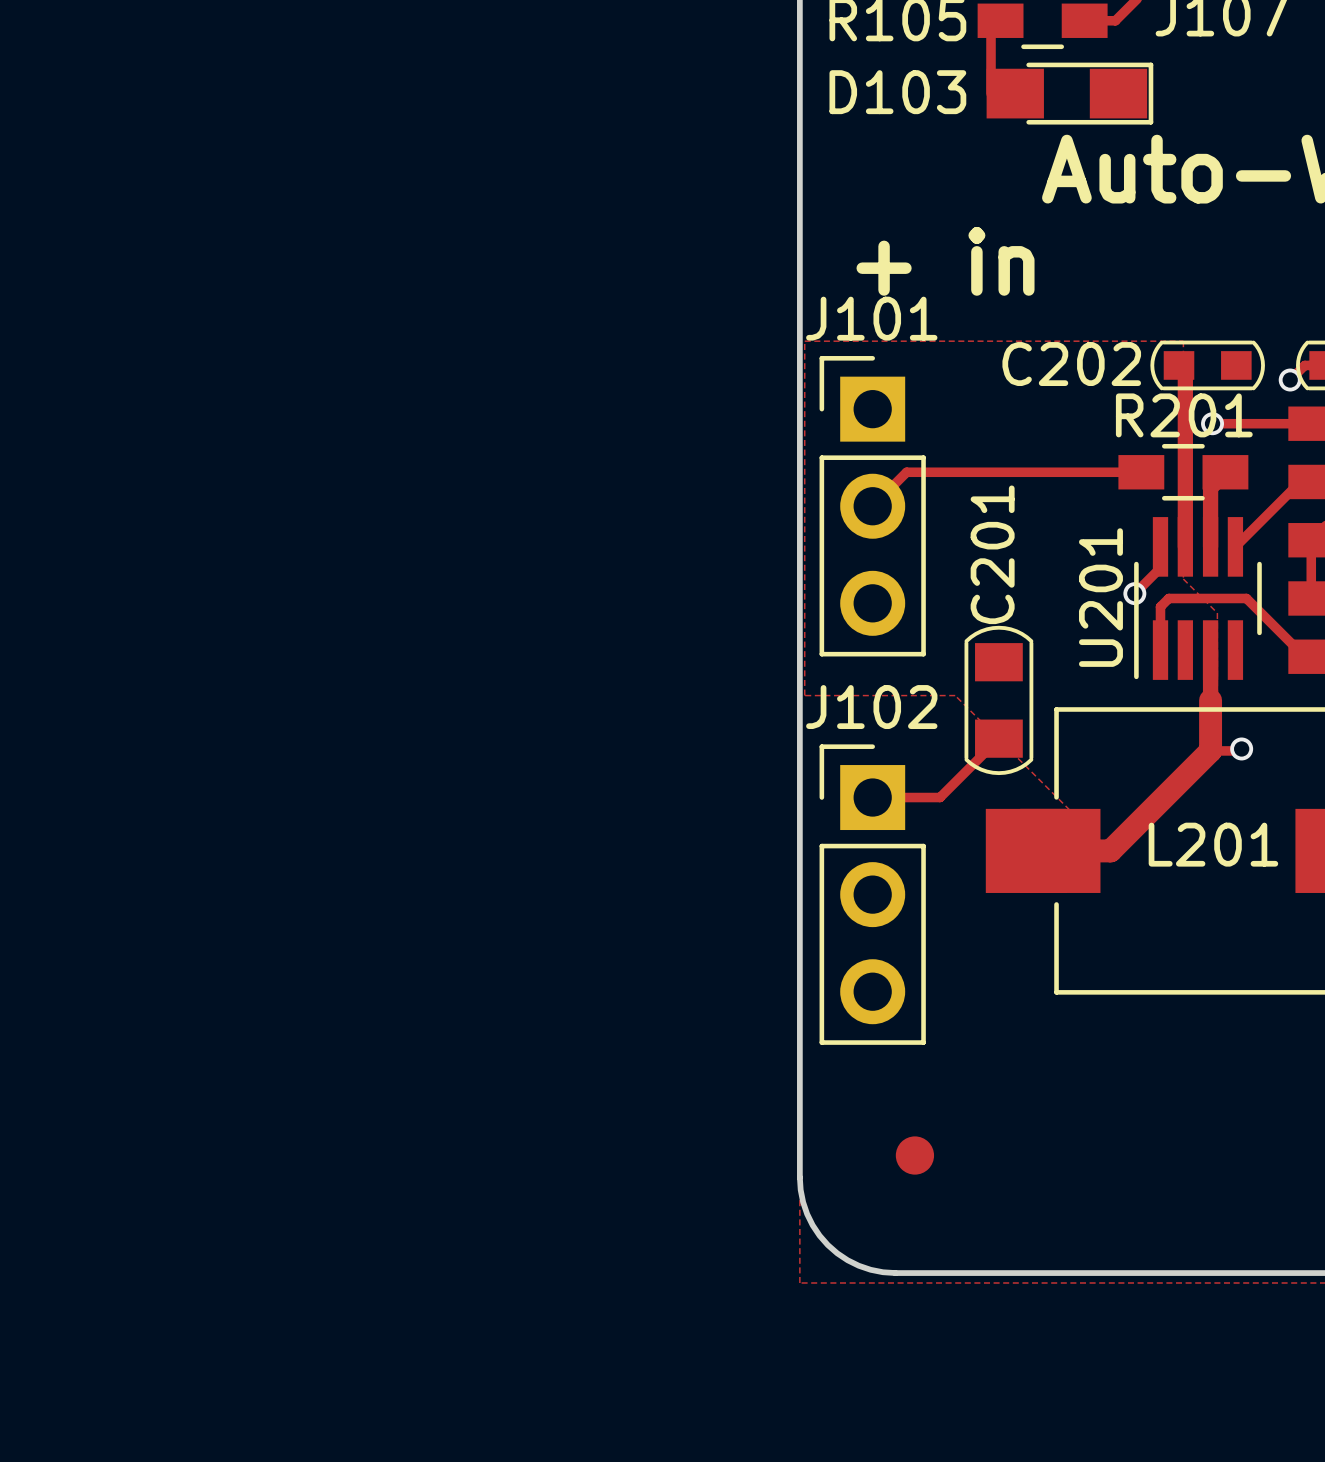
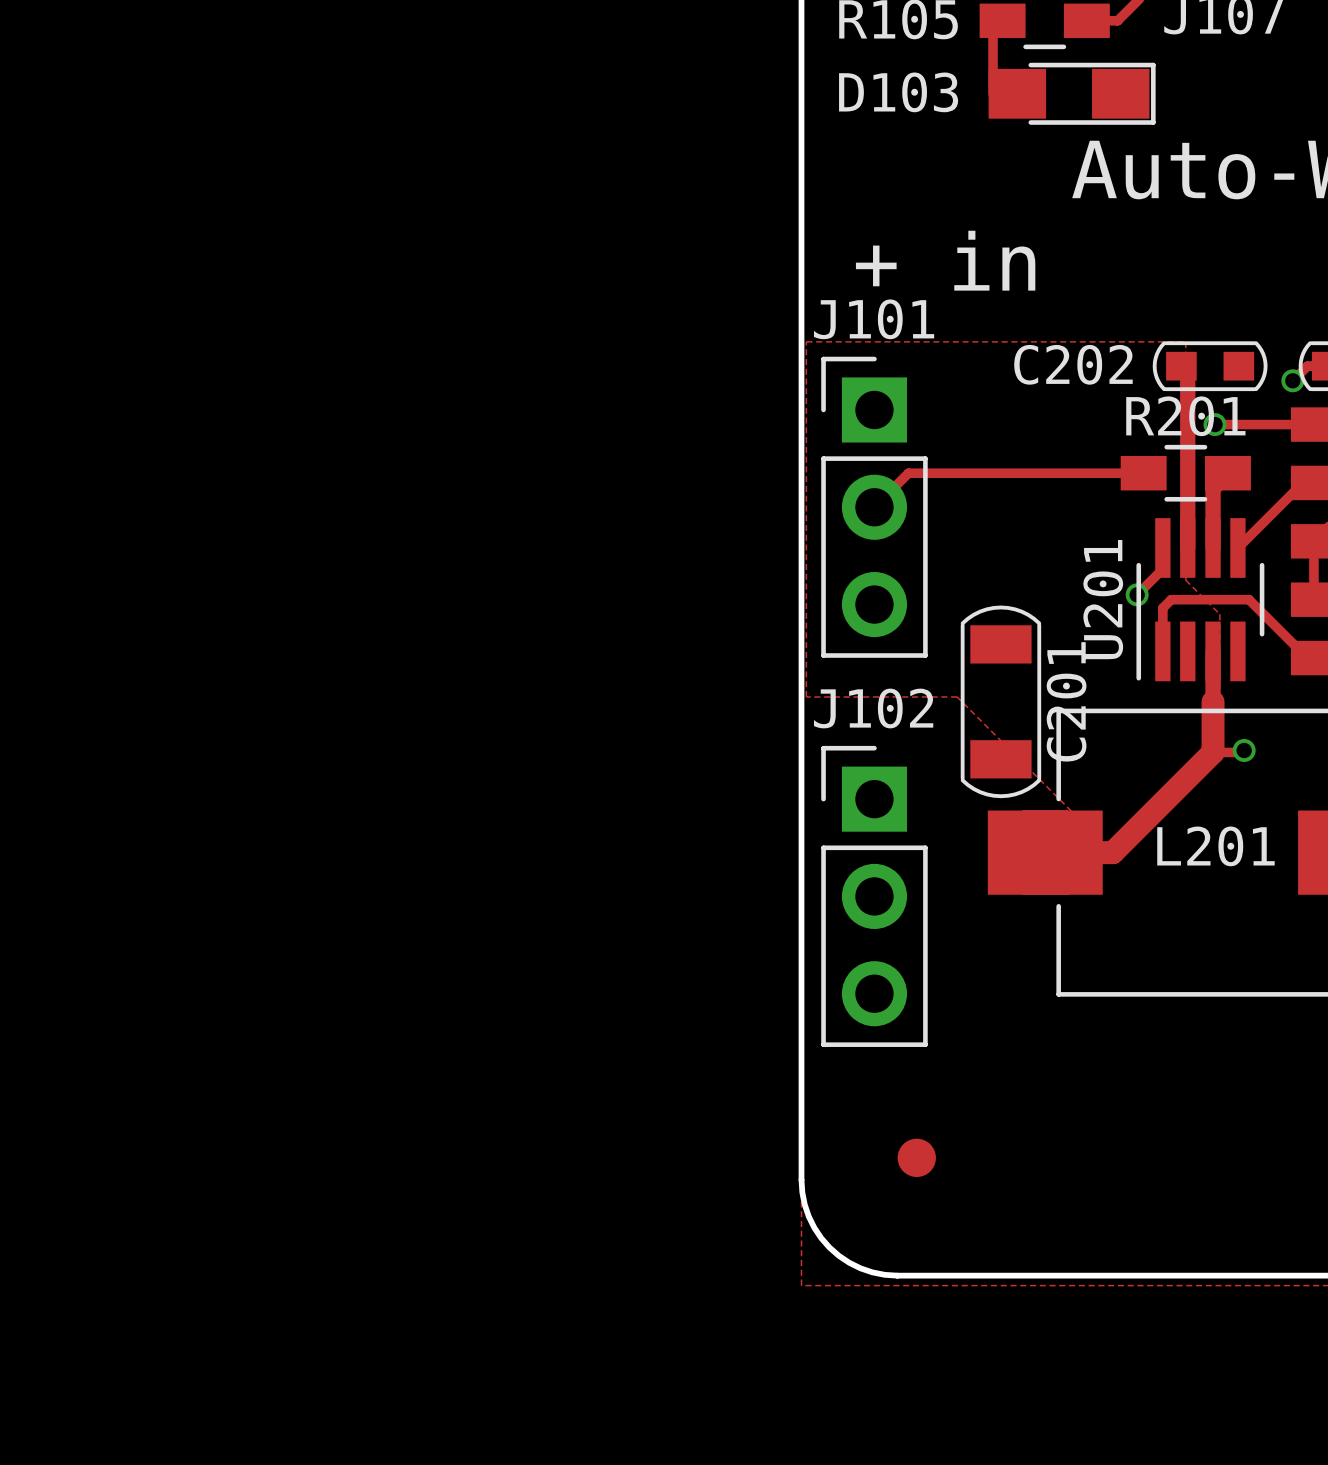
C201 name position: C201 (992, 554) -> C201 (1066, 701)
C201 footprint: [964, 625, 1034, 776] -> [960, 605, 1042, 799]
track: (998, 738) (940, 797) (872, 797) -> none

